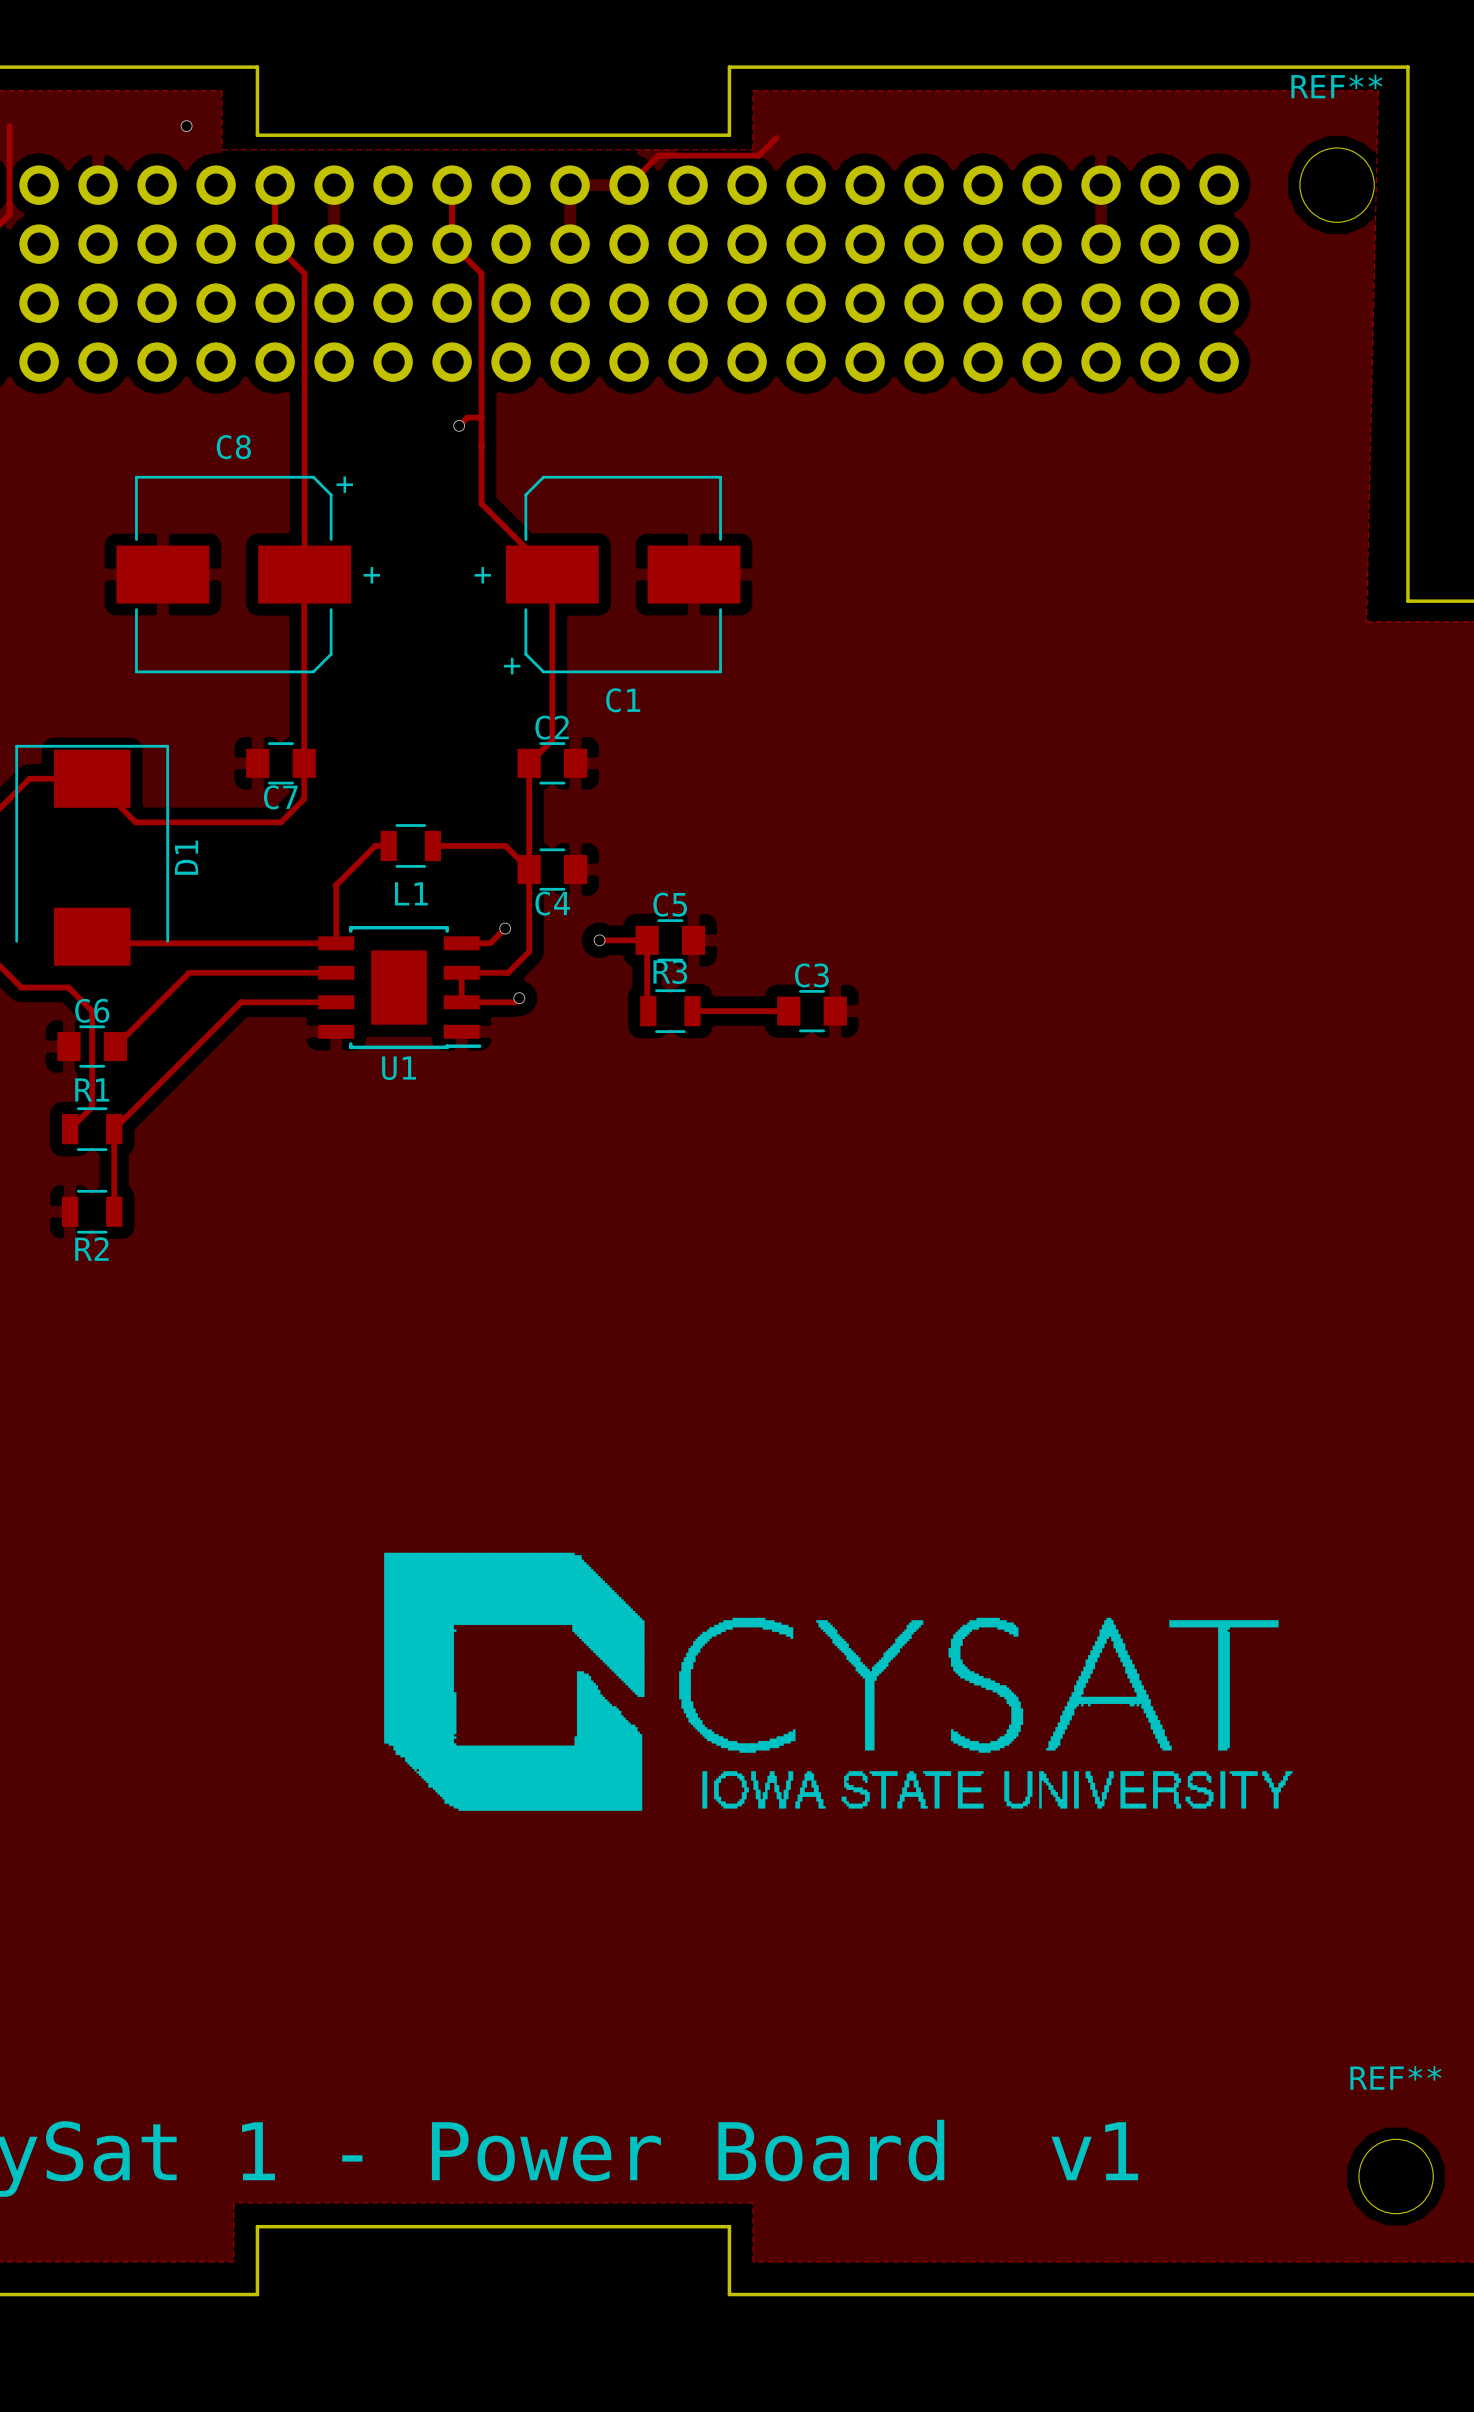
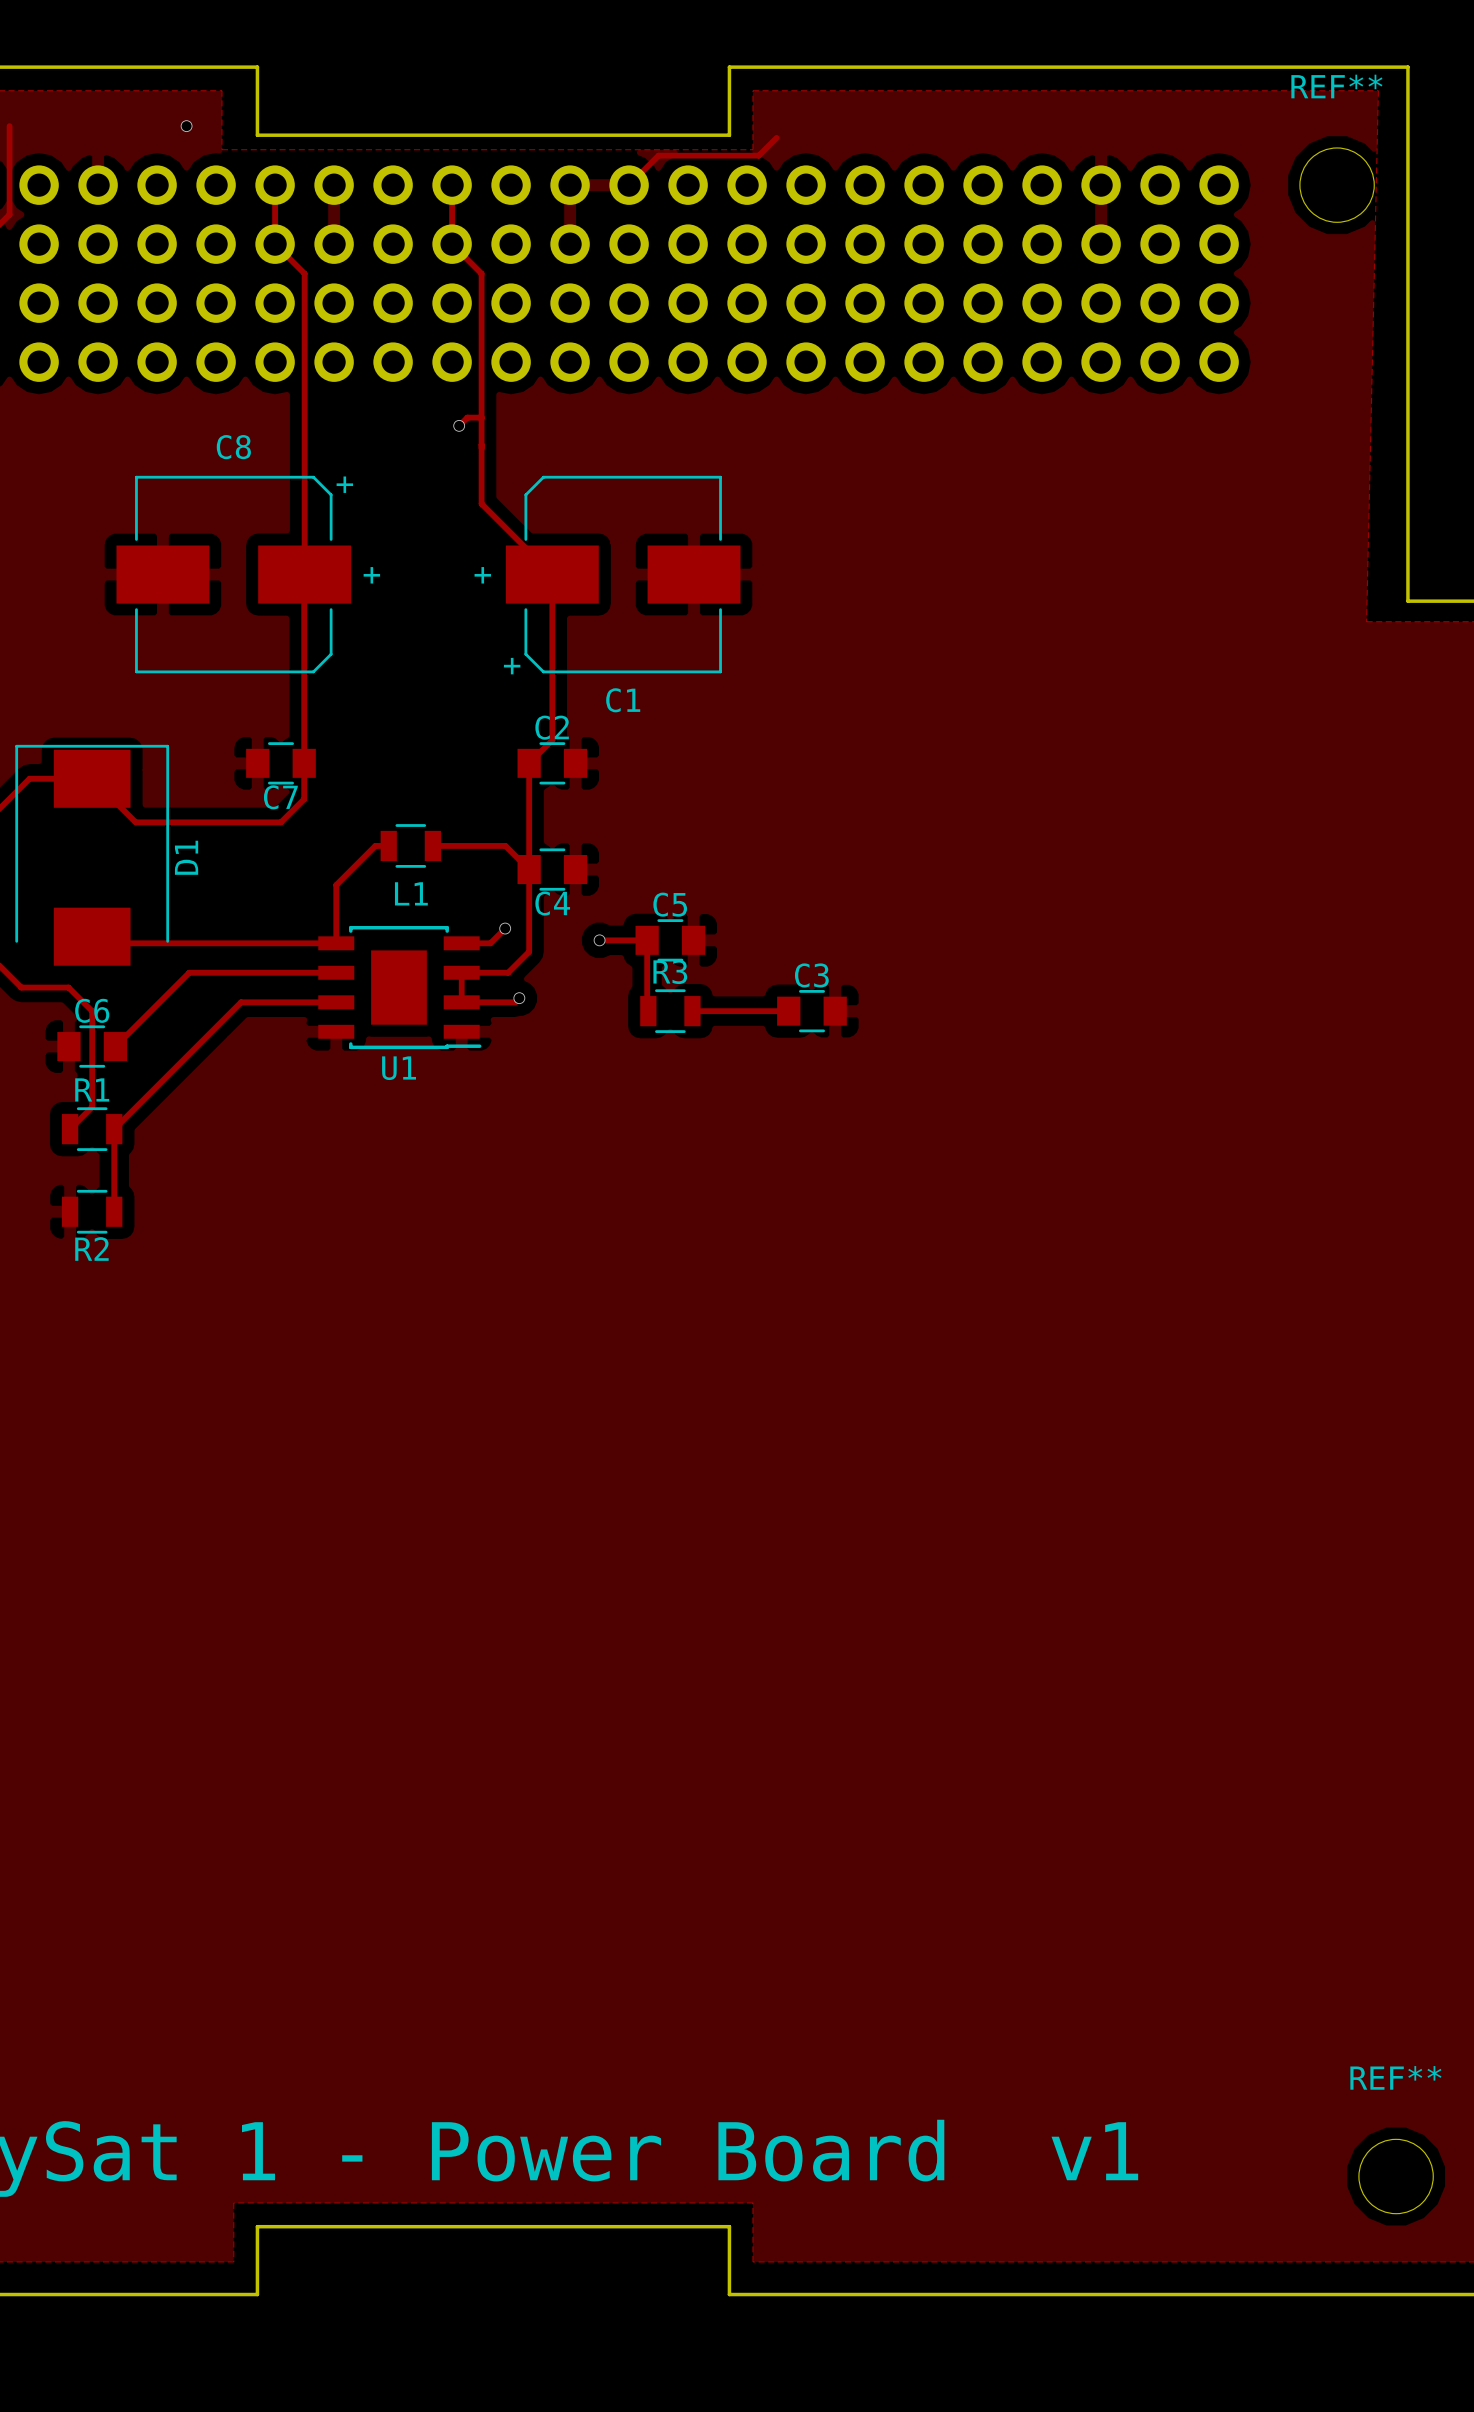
drawing: [384, 1552, 1293, 1811] -> none

